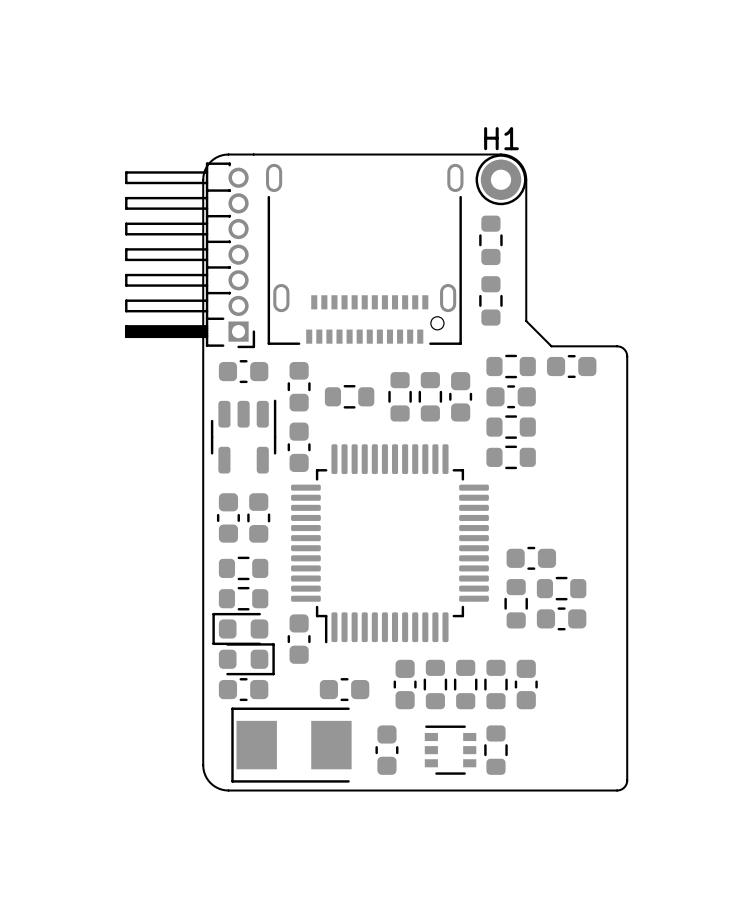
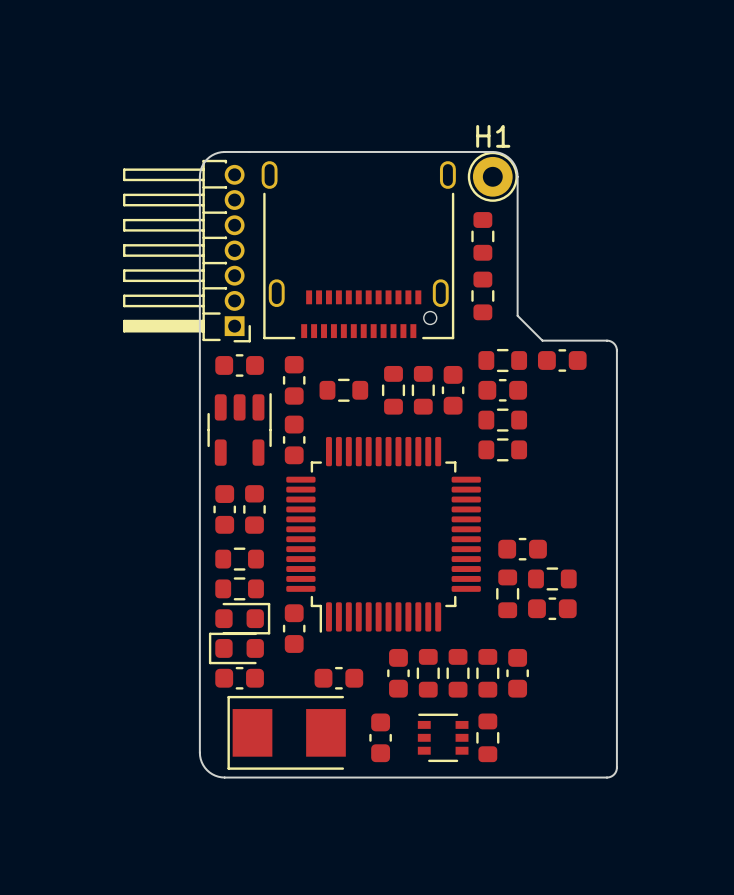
part rotation: 0° (240, 628) -> 180° (242, 618)
part rotation: 0° (246, 659) -> 180° (236, 648)

